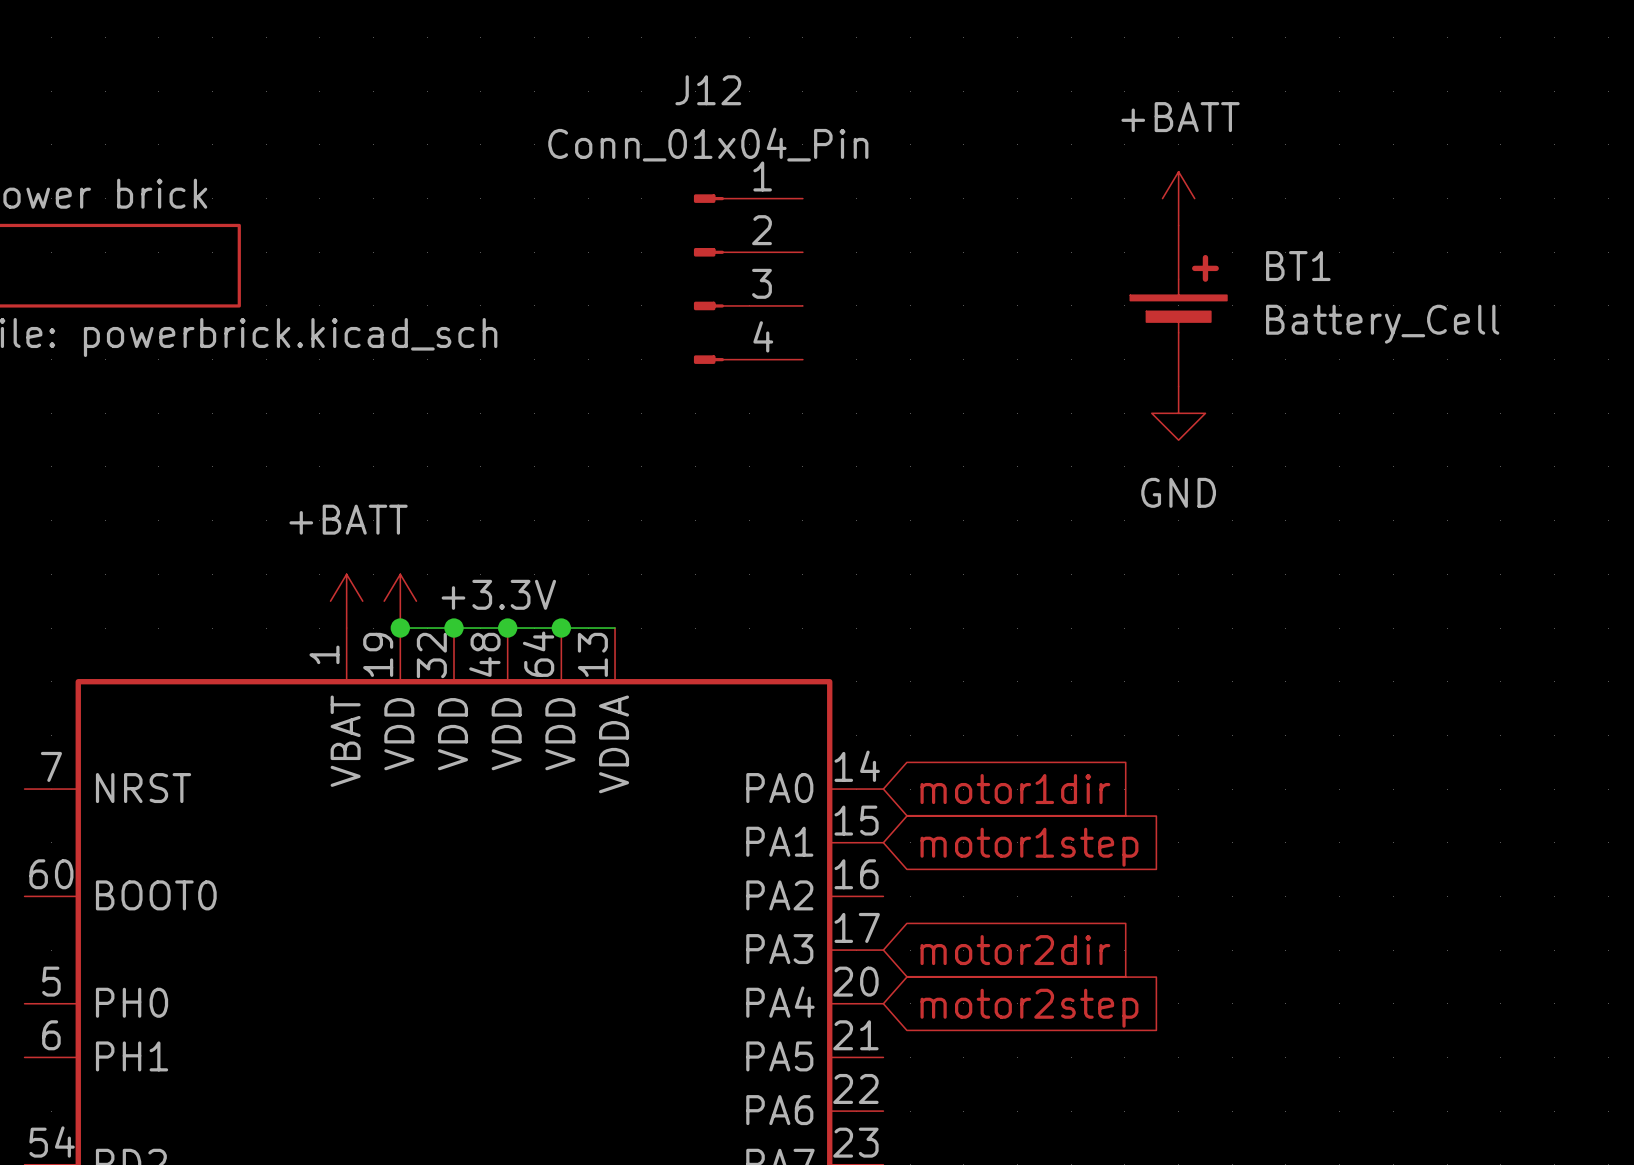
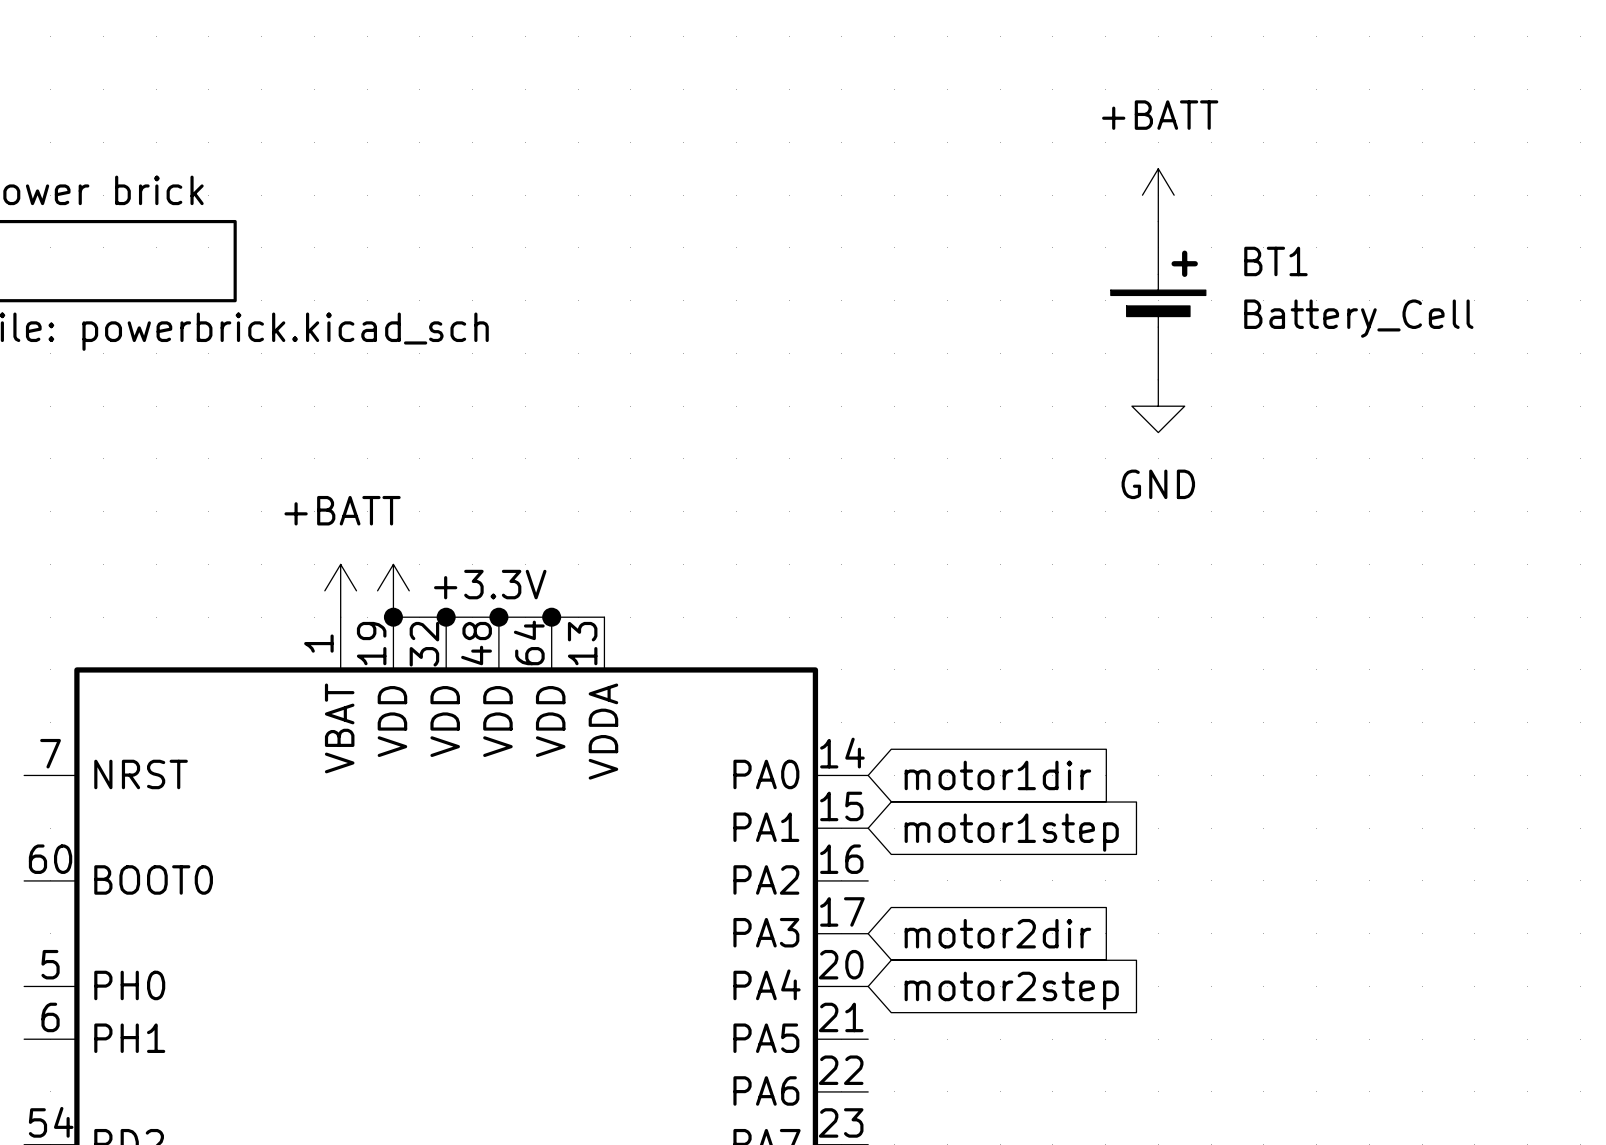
J12: Conn_01x04_Pin (748, 279) -> none

